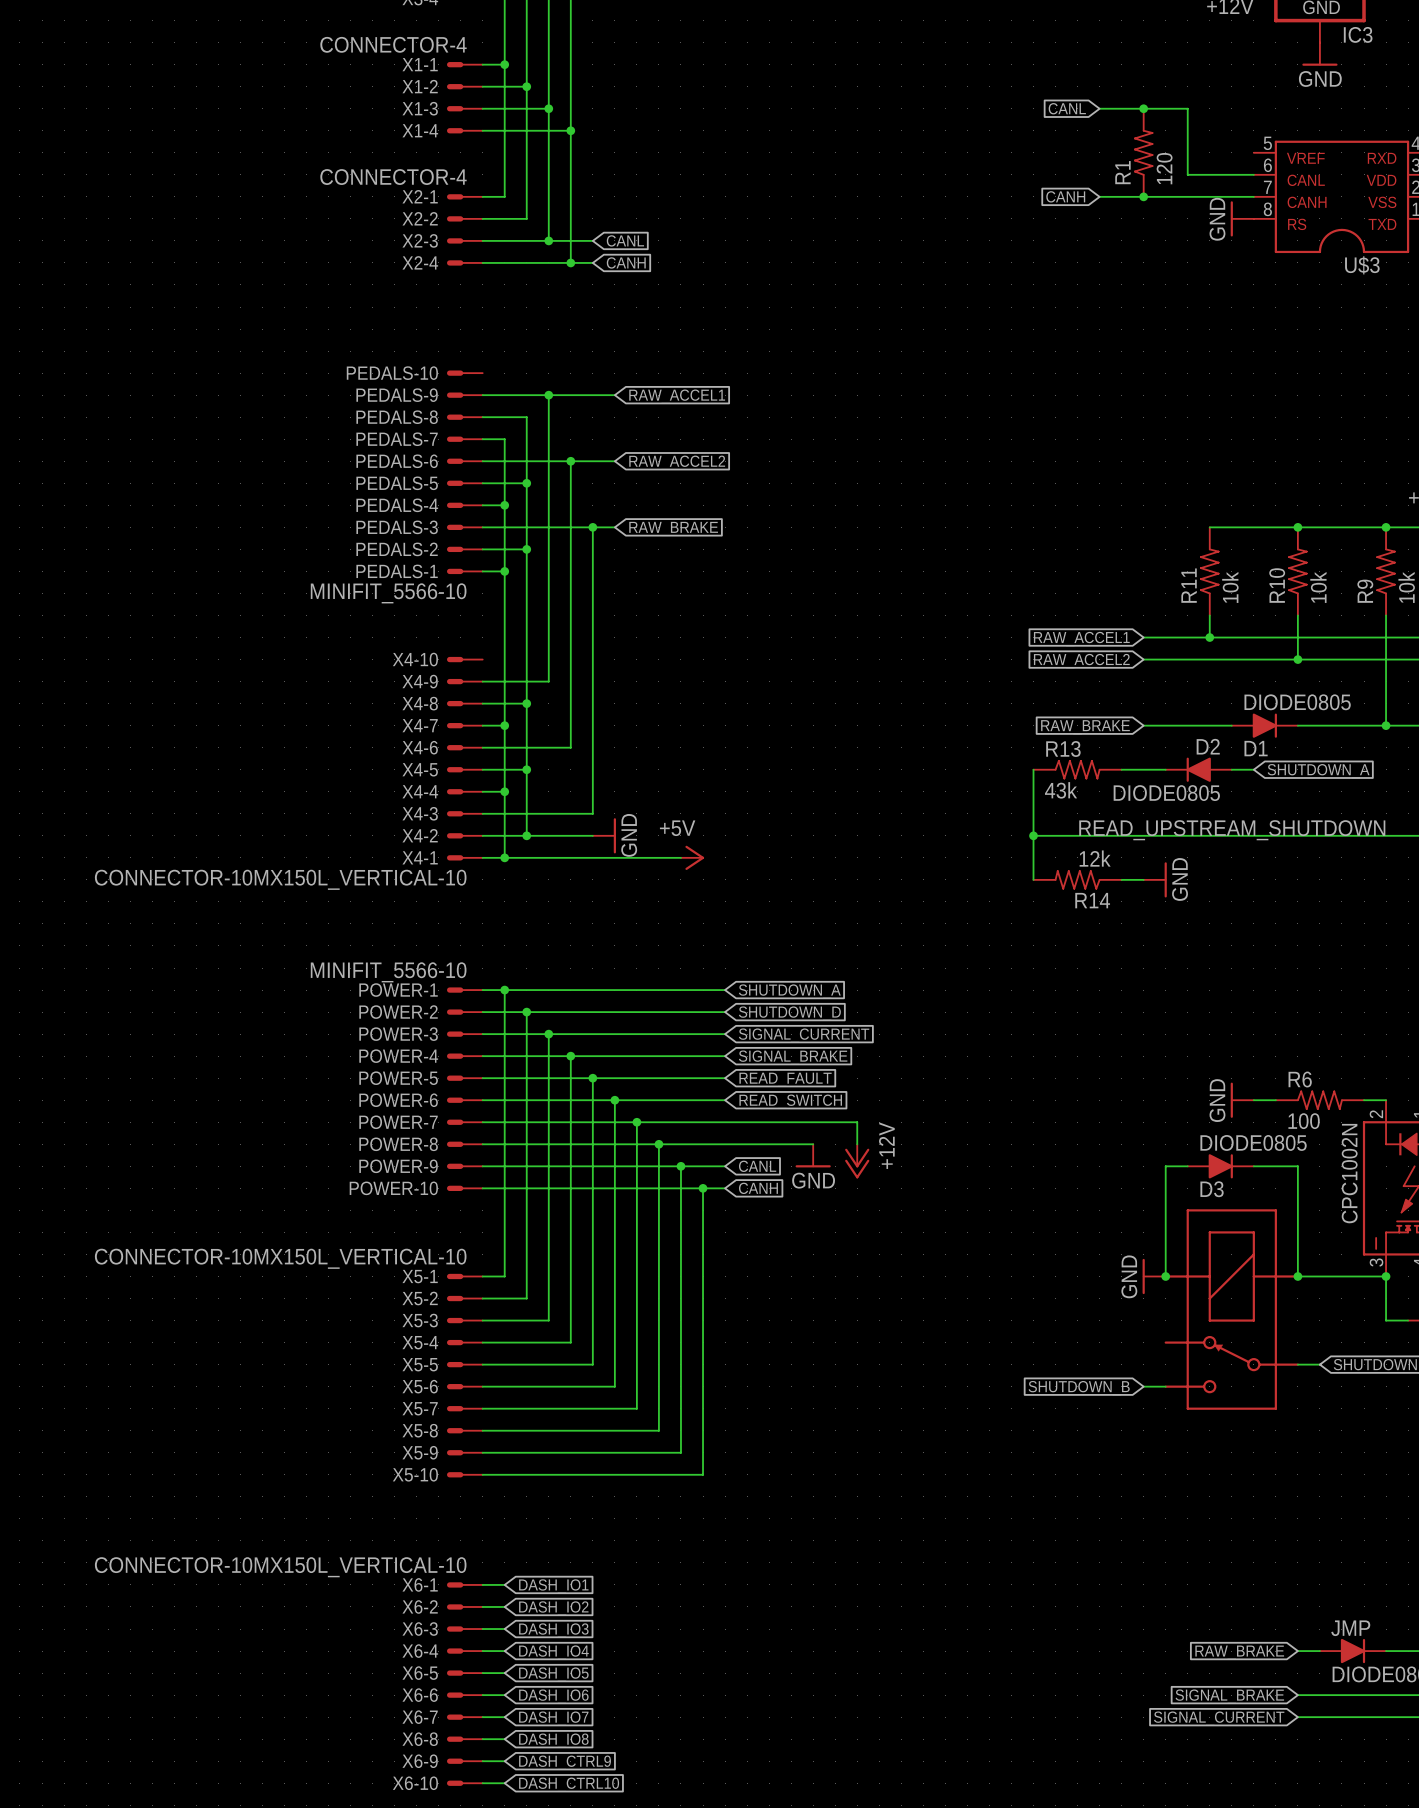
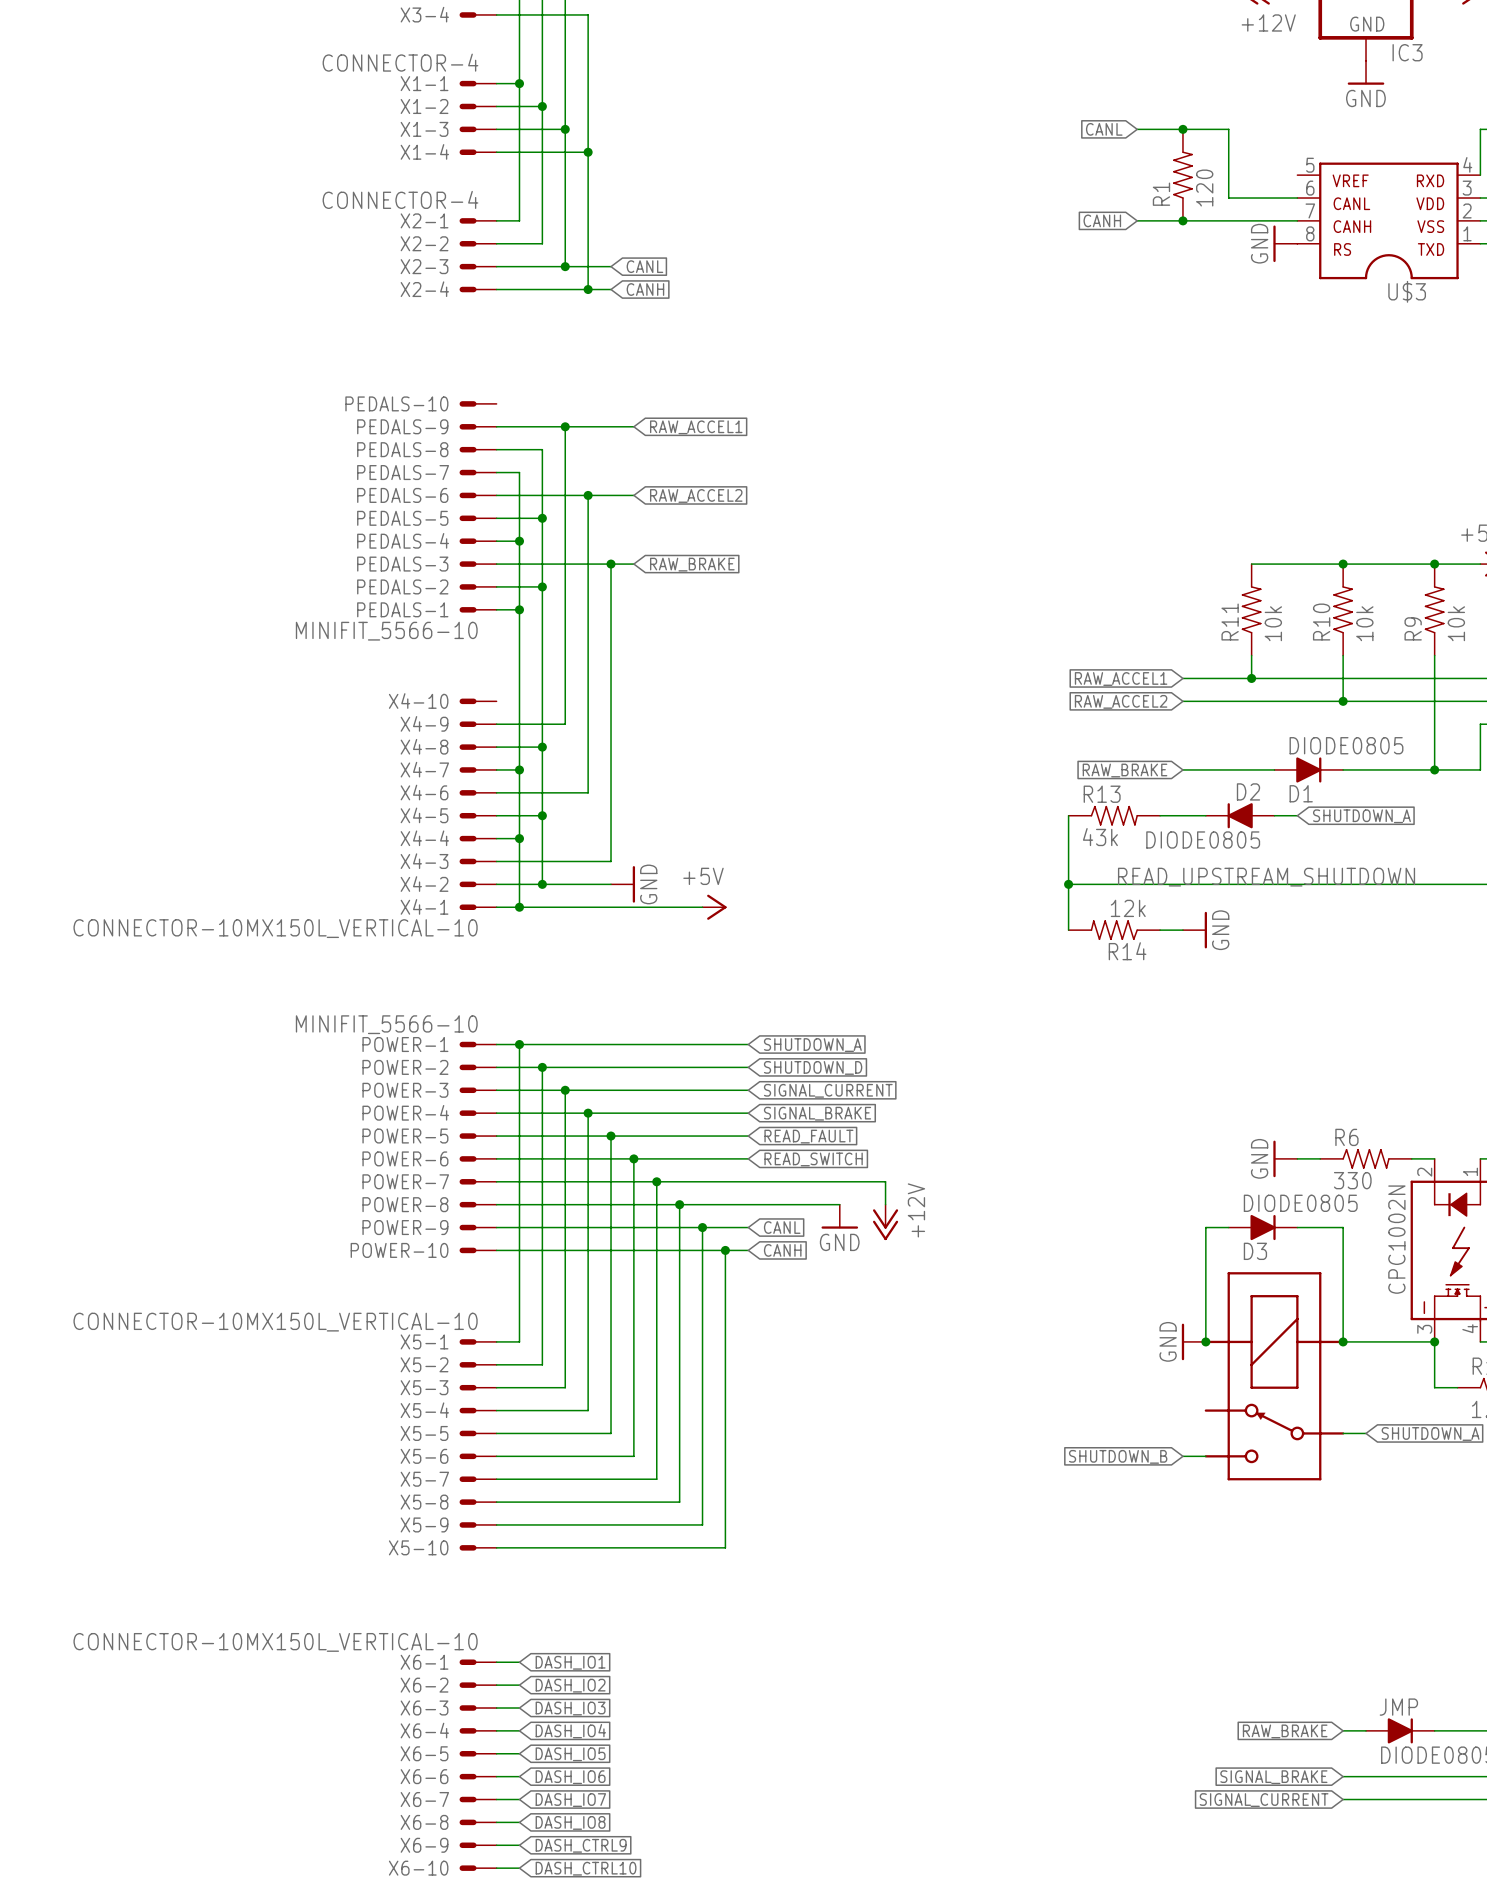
R6 value: 100 (1304, 1121) -> 330 (1352, 1180)

